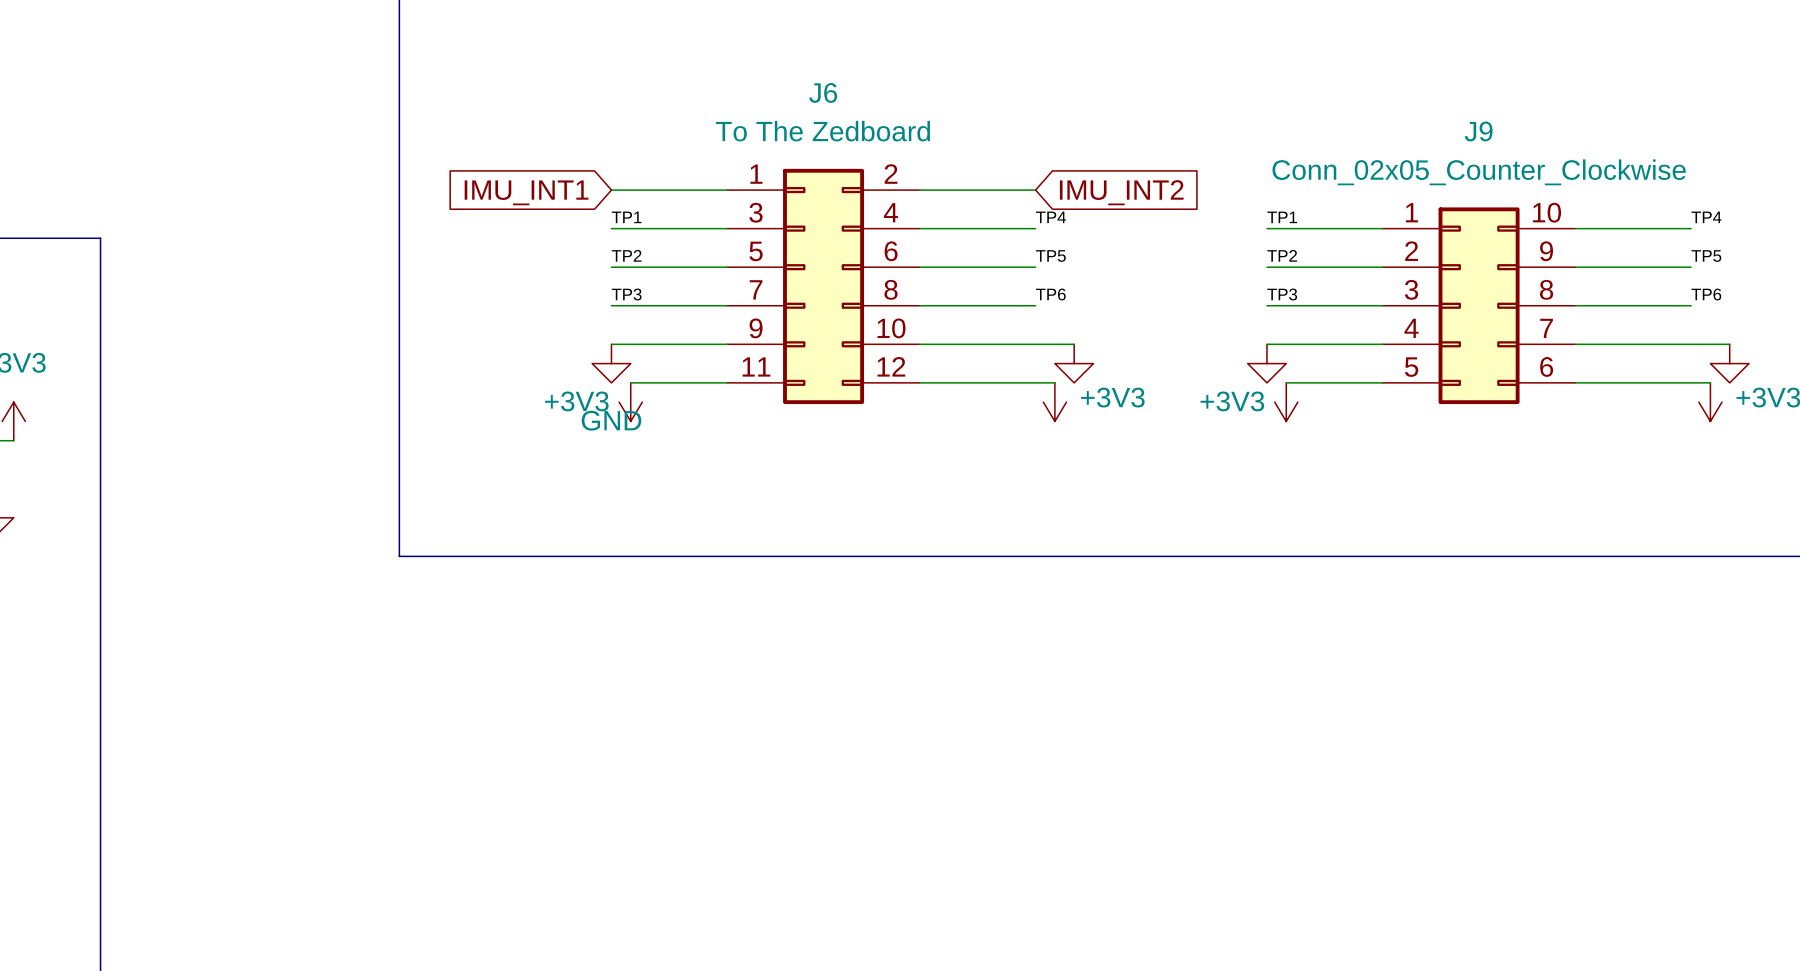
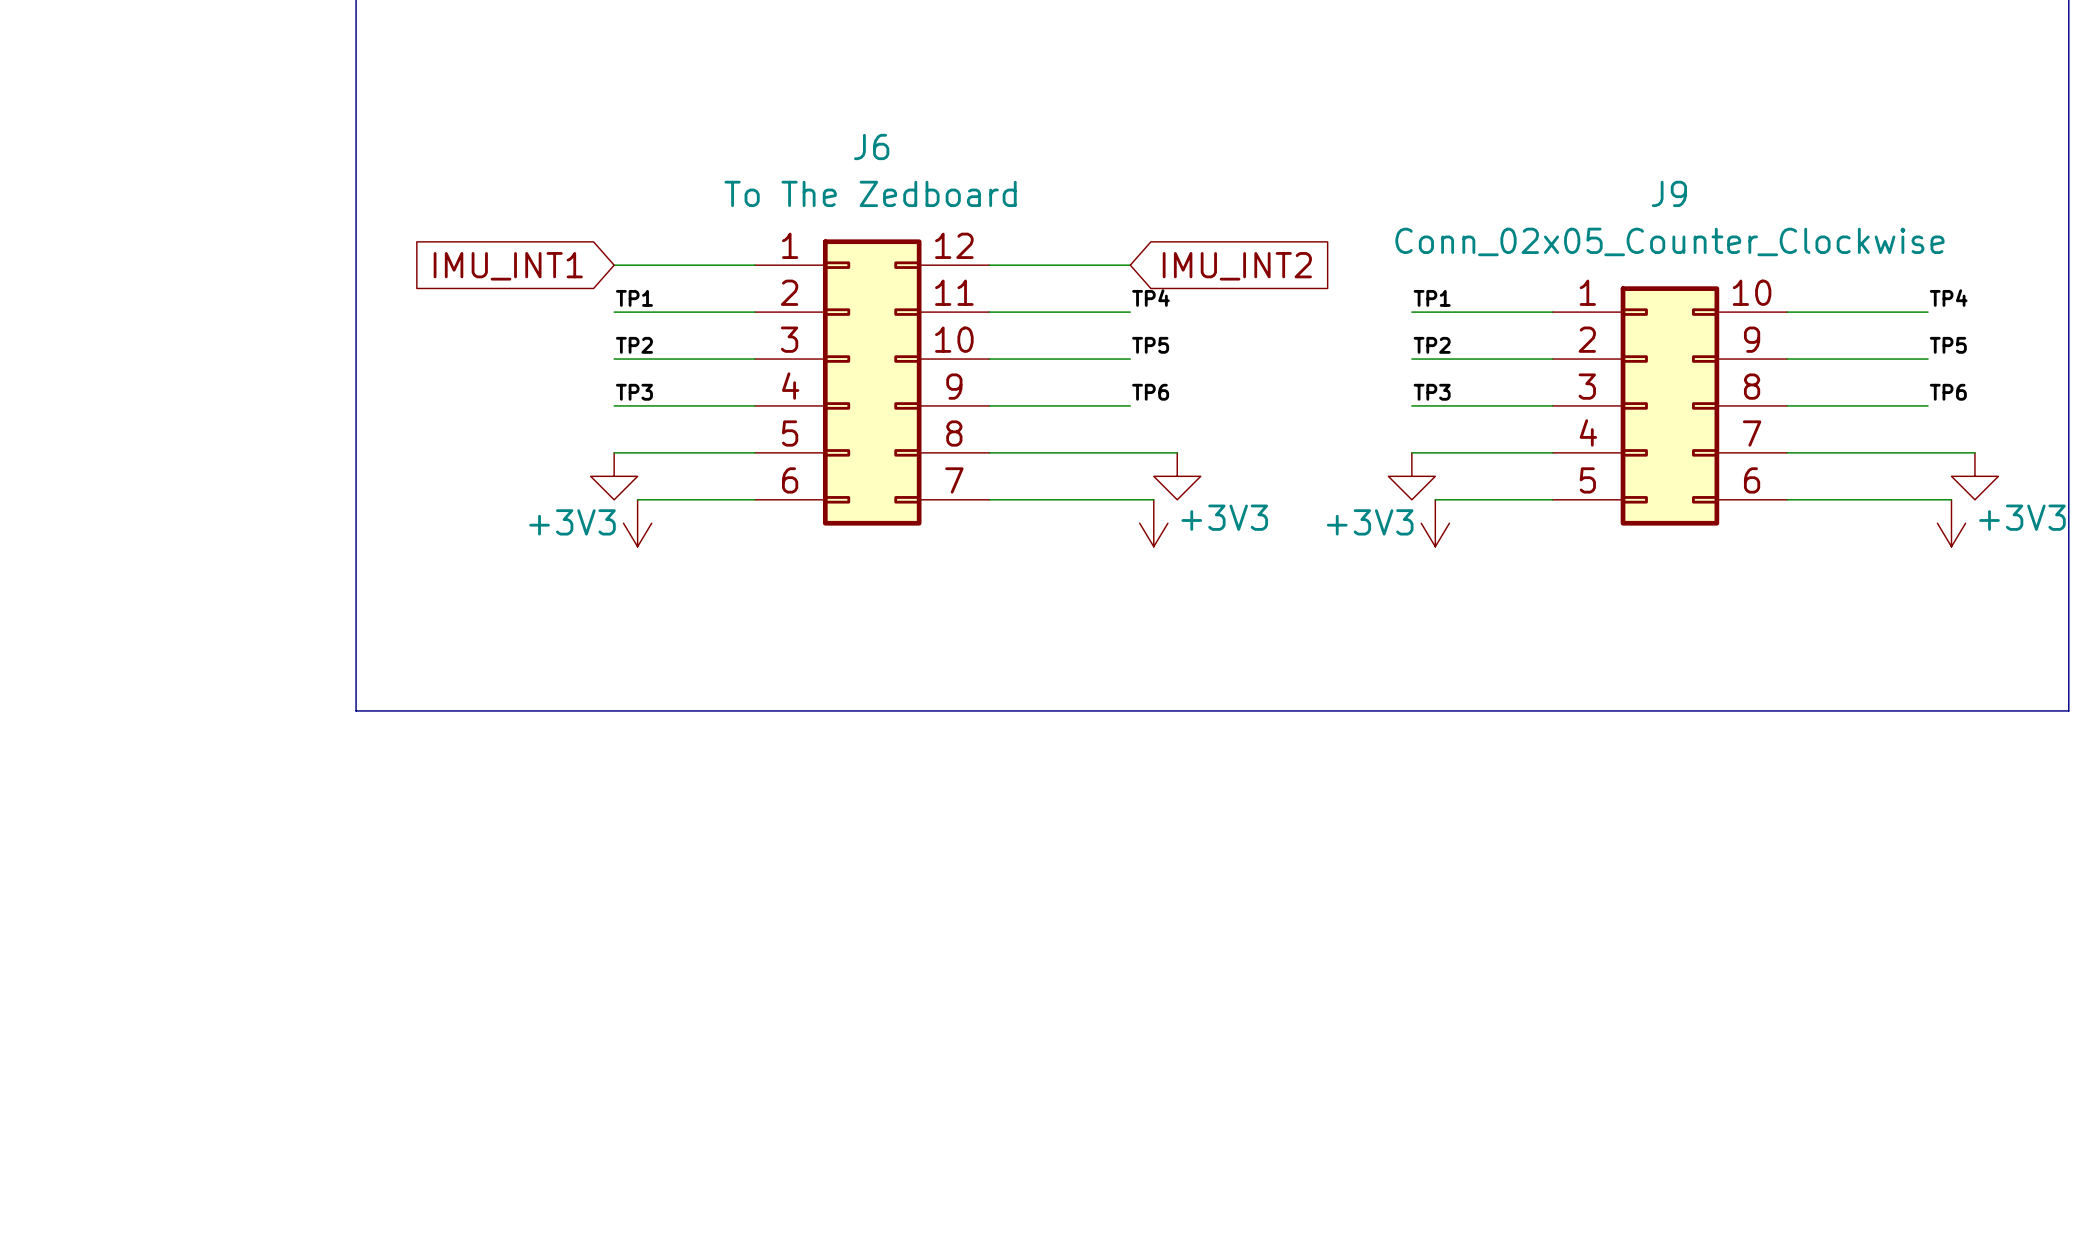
J6 symbol: [727, 168, 920, 405] -> [754, 239, 990, 526]
power symbol text: GND (611, 420) -> none

